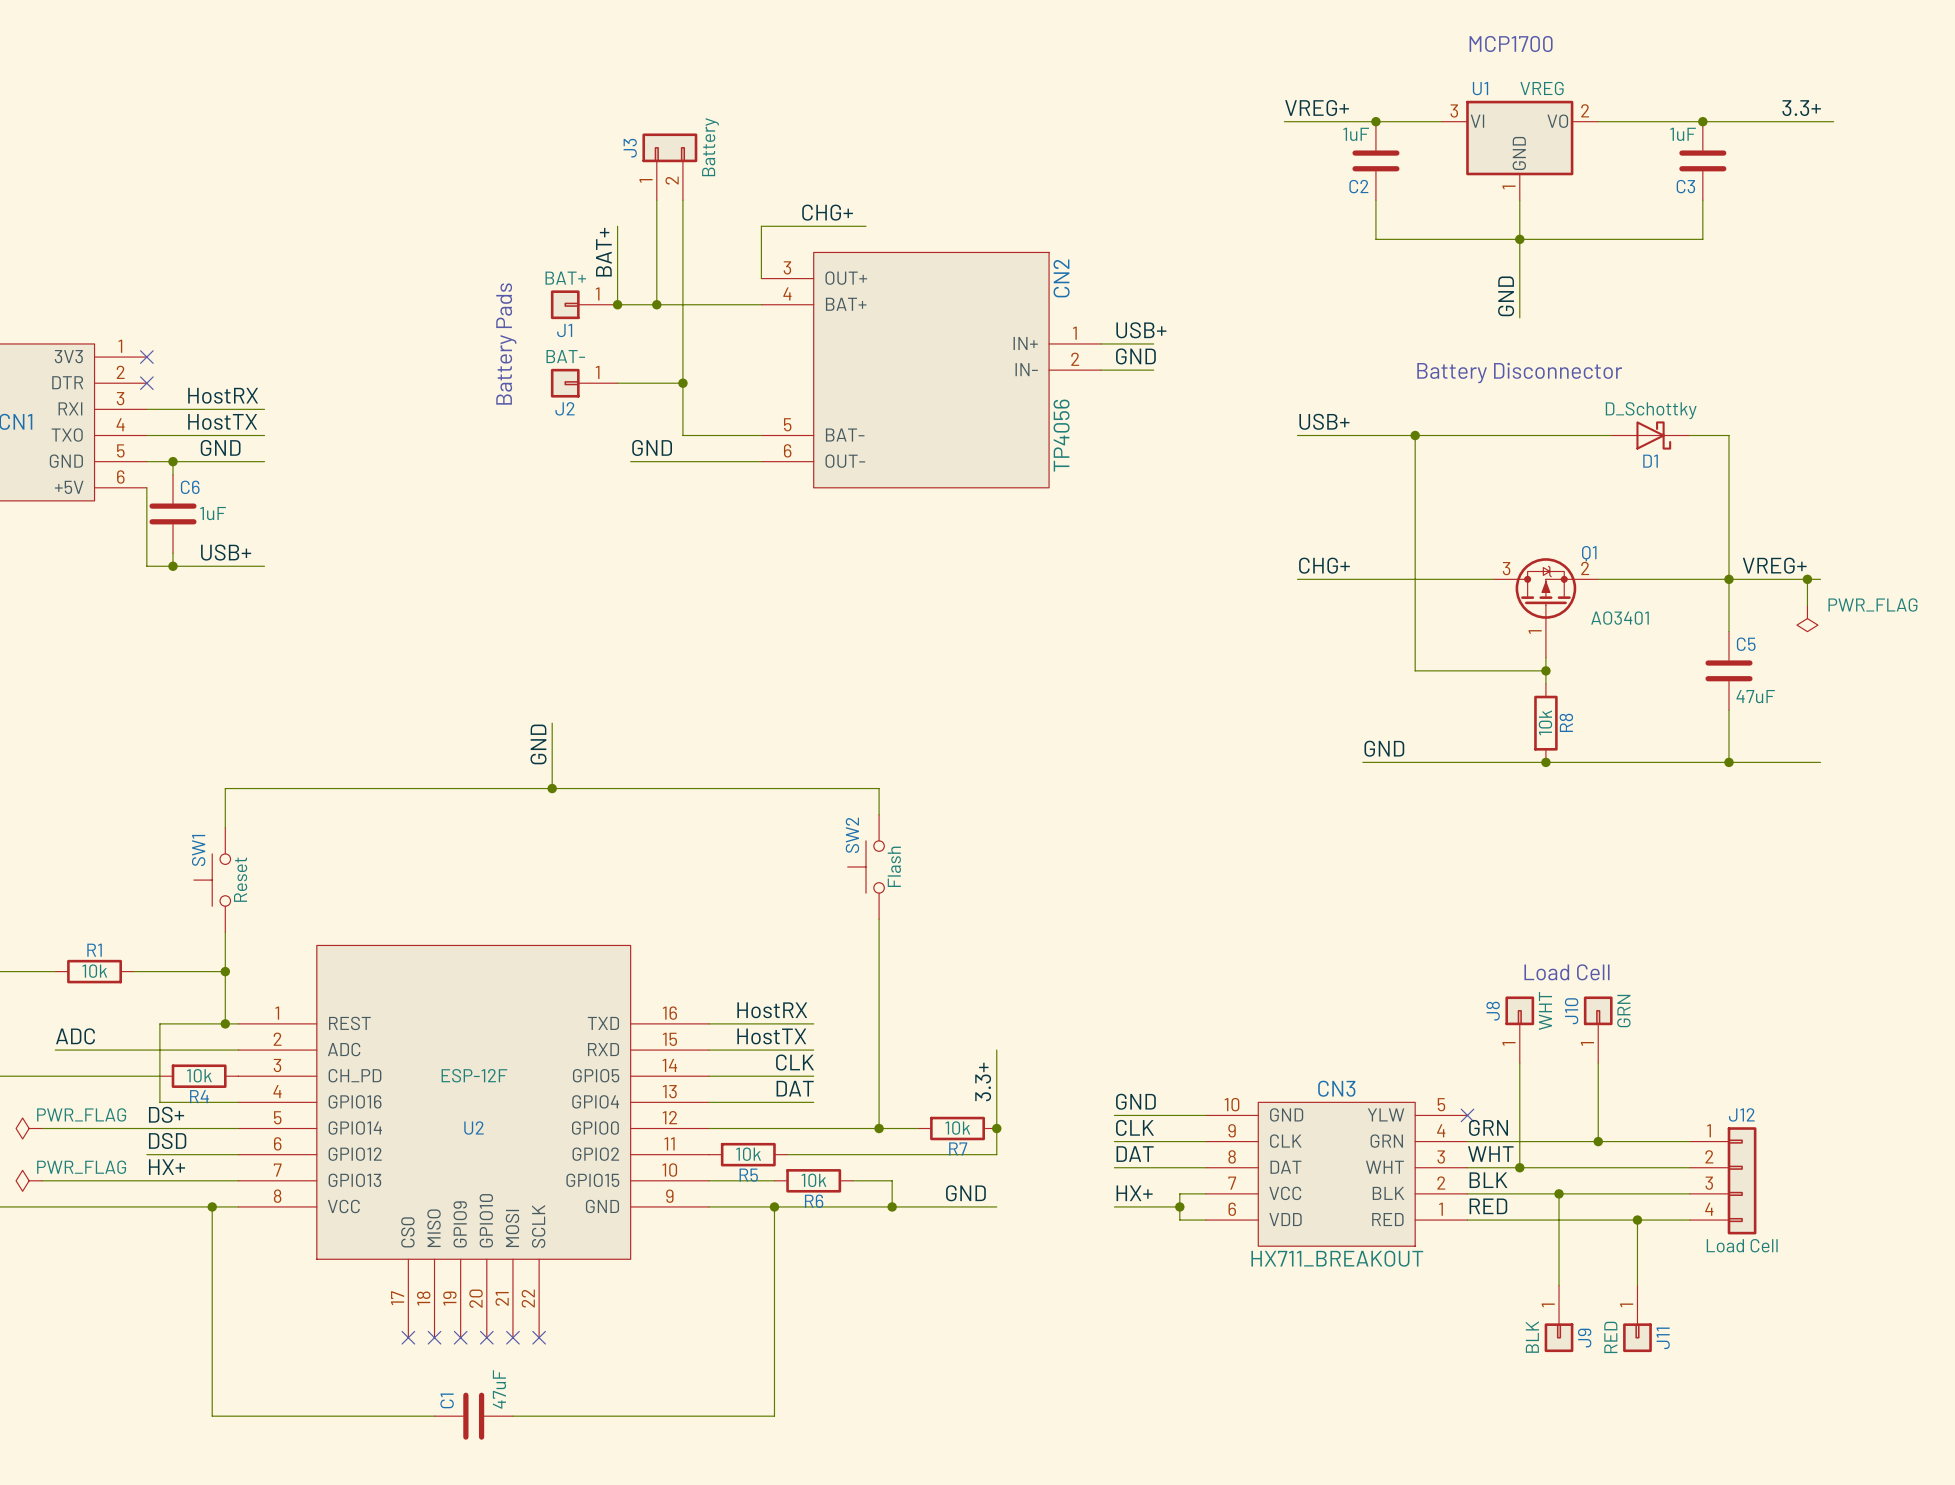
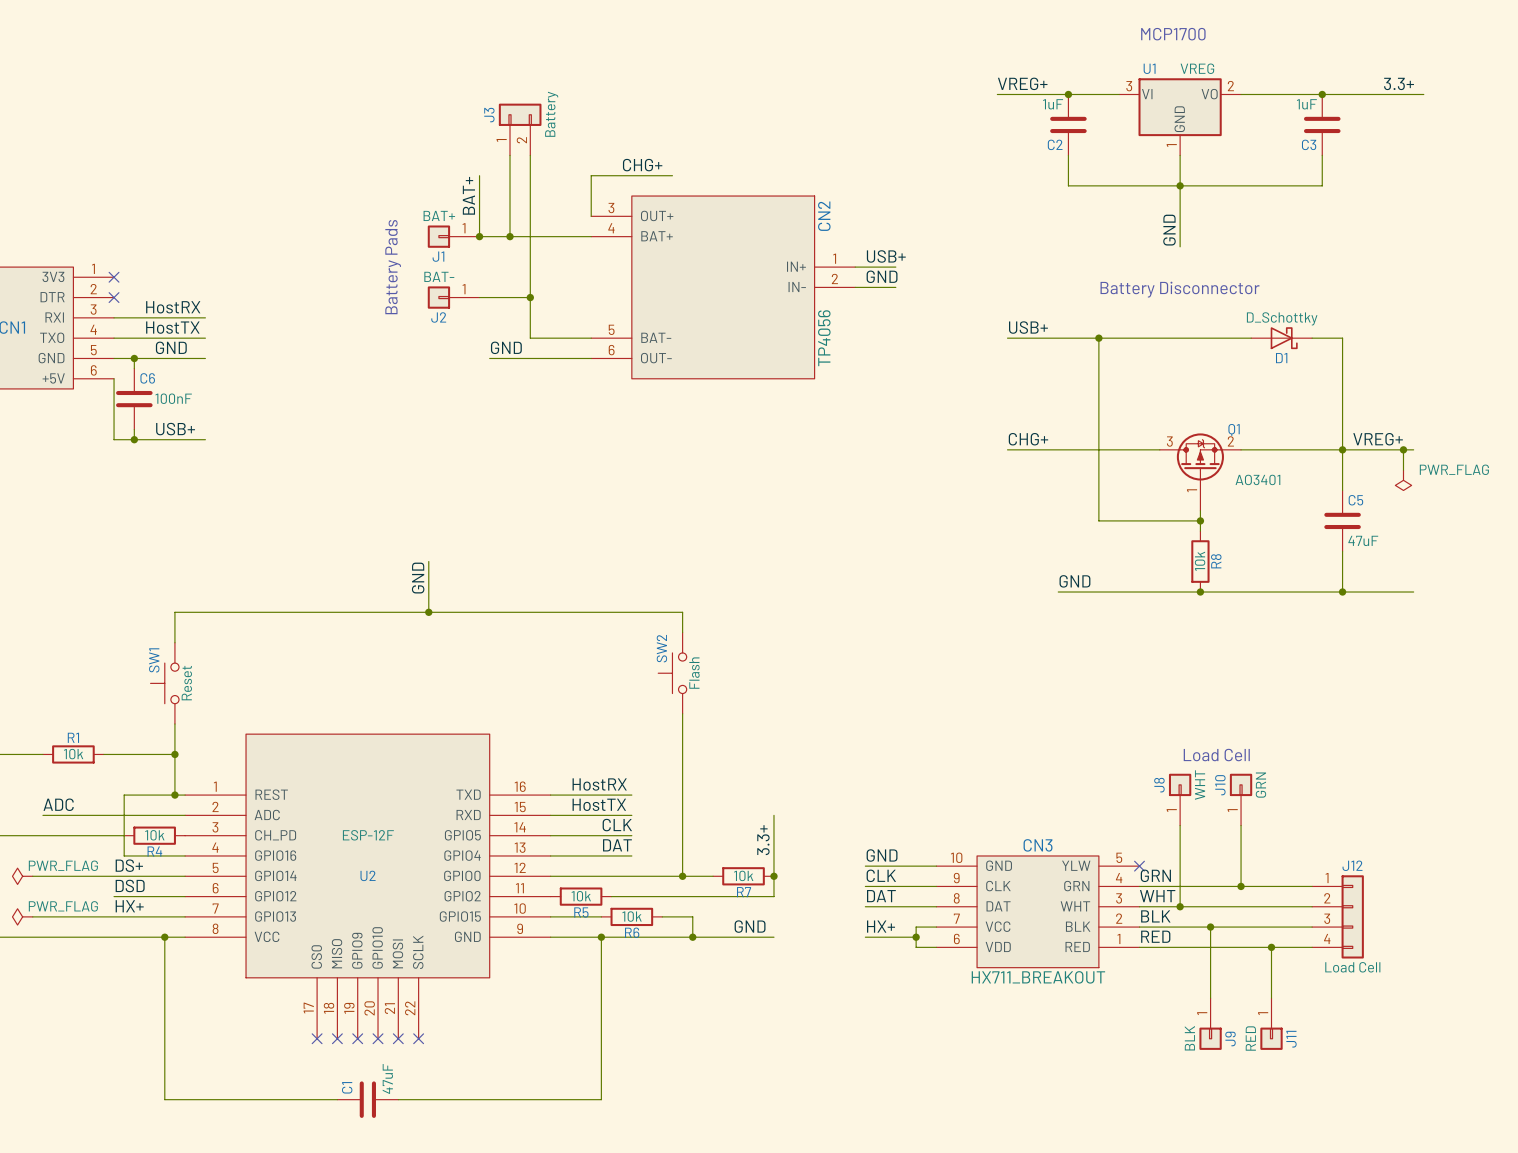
C6 value: 1uF (213, 513) -> 100nF (173, 398)

